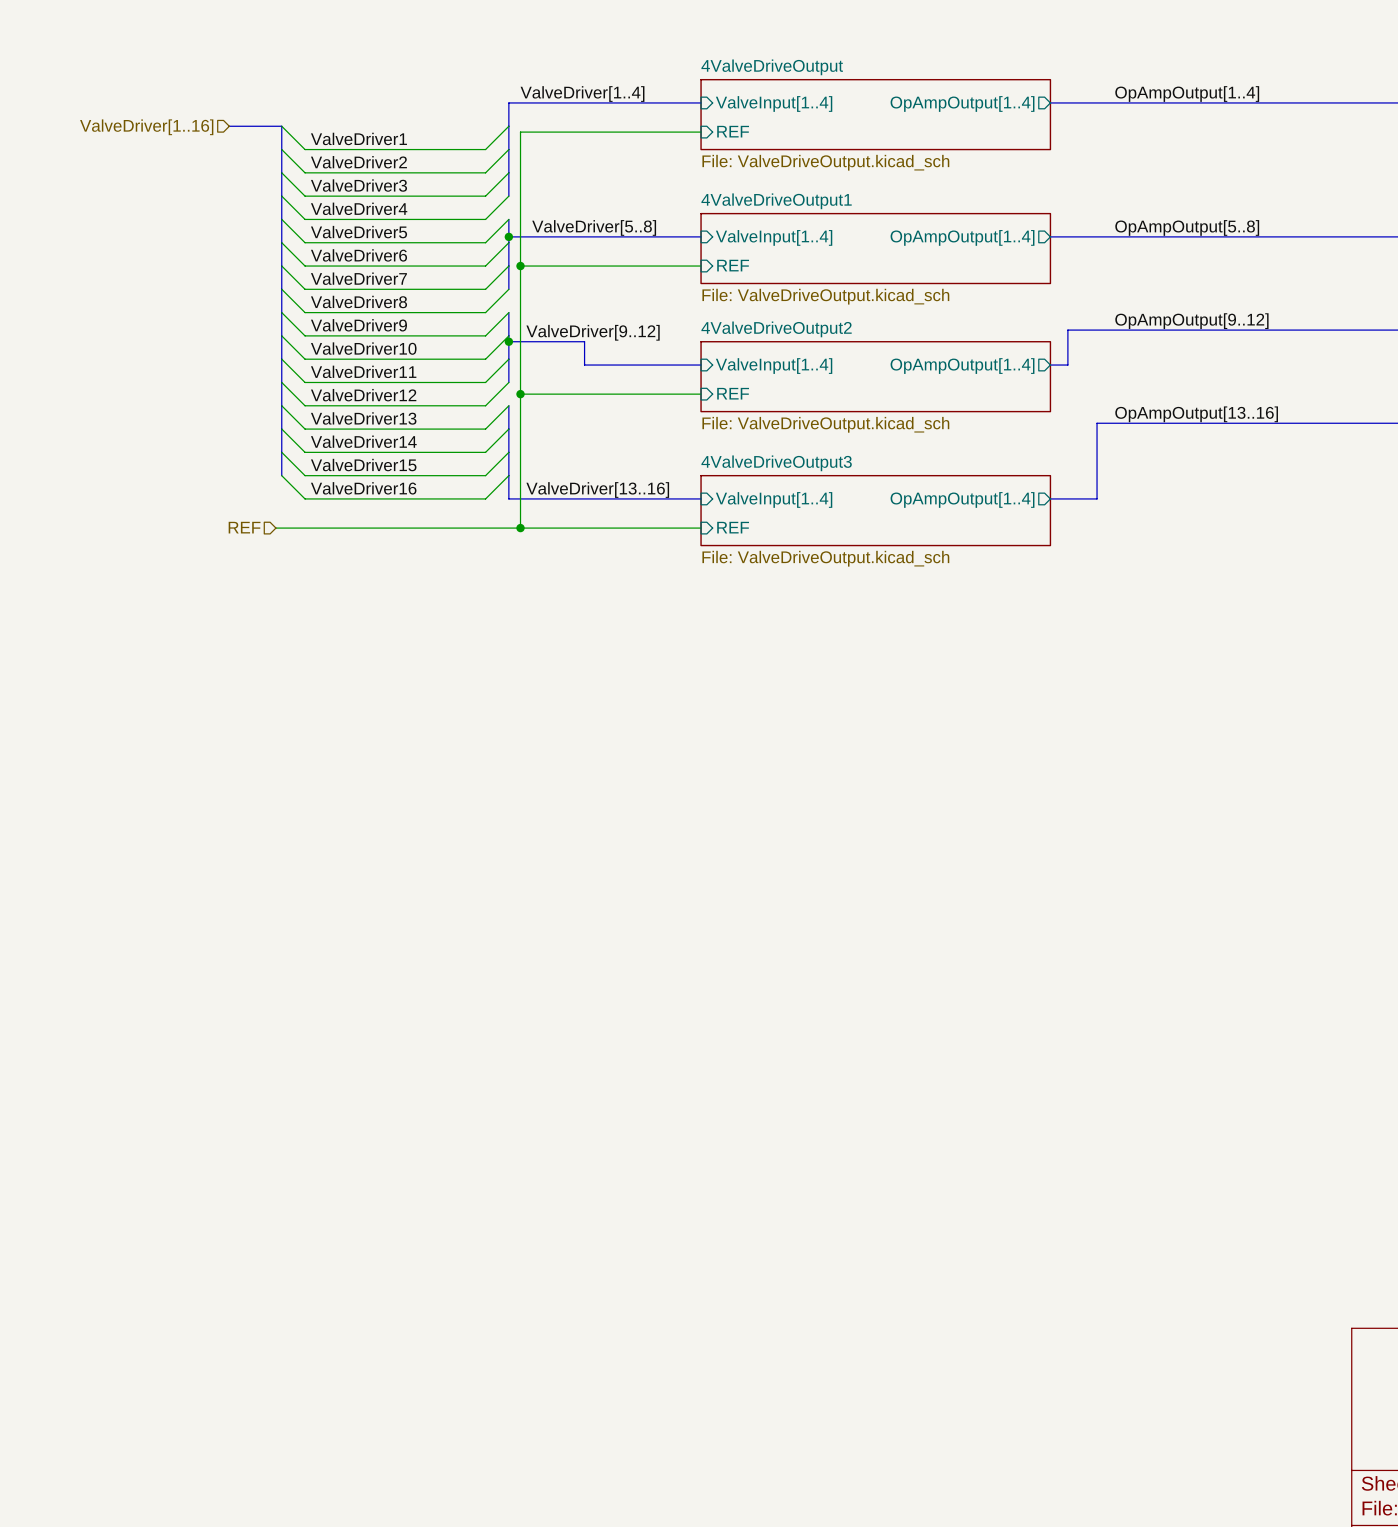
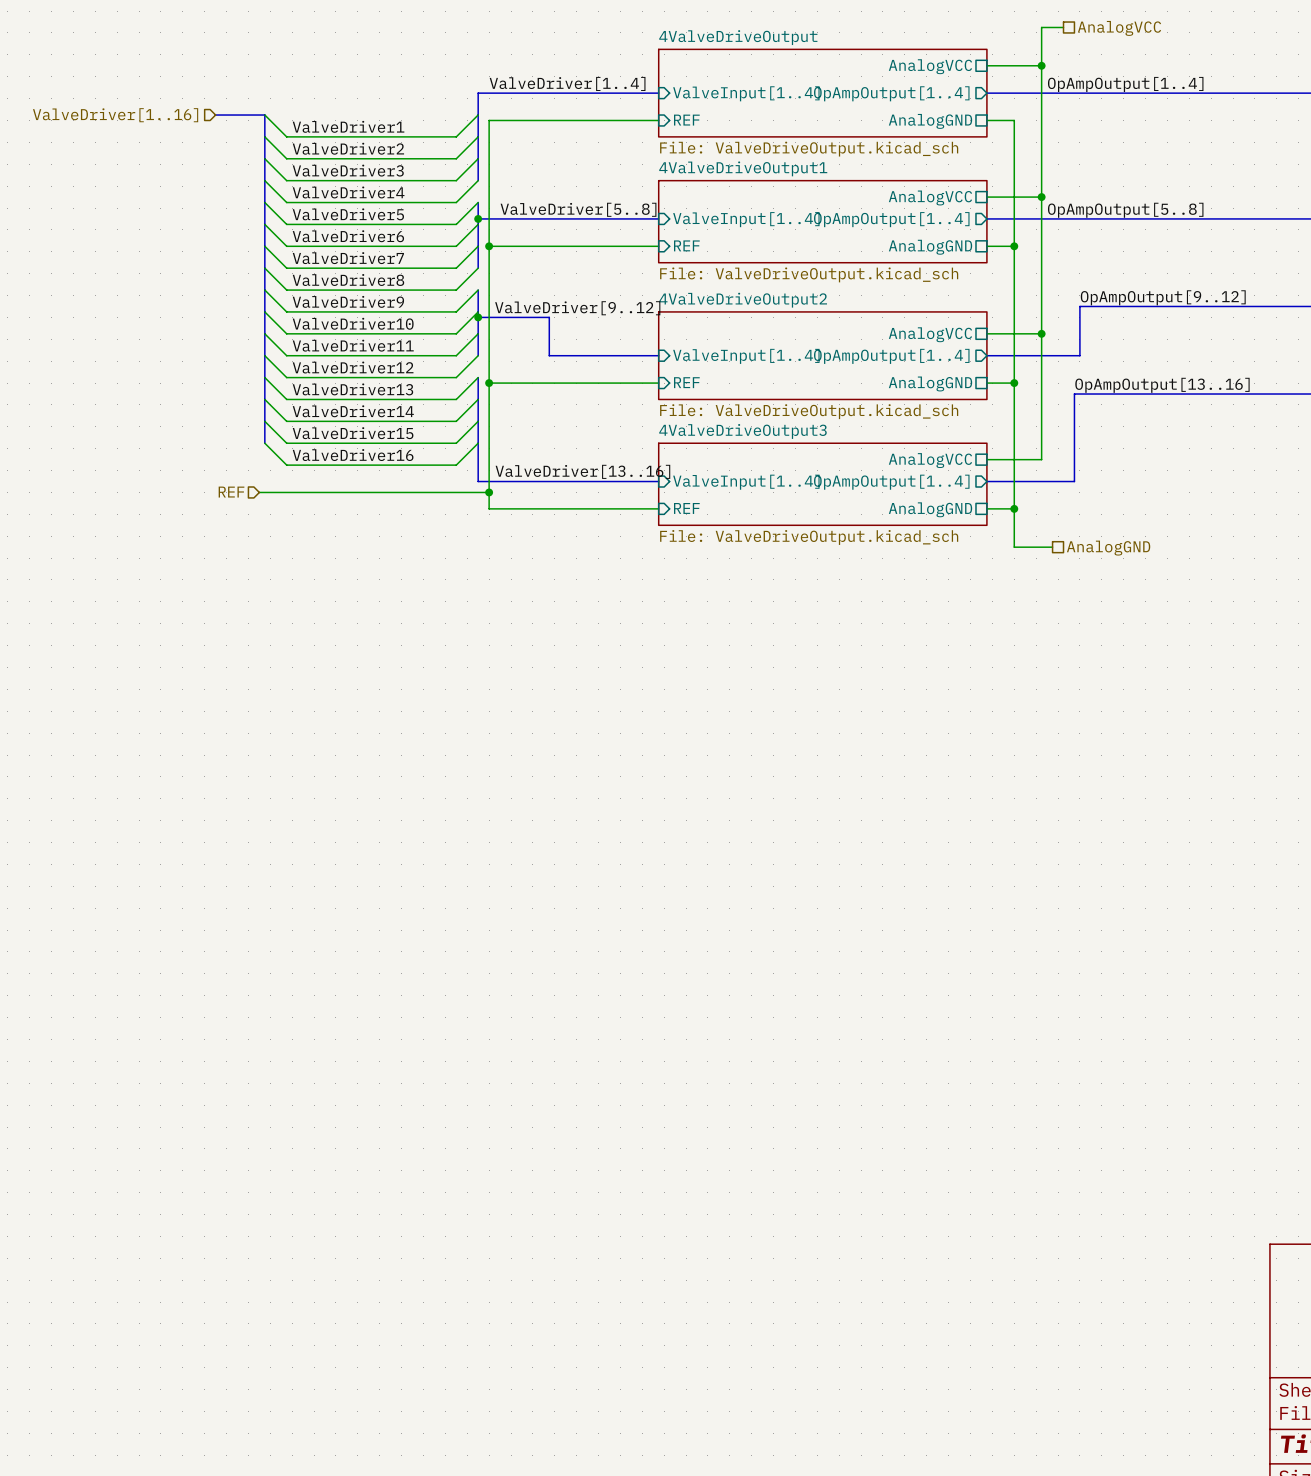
wire: none -> (1063, 27) (1041, 27) (1041, 459) (986, 459)
hierarchical label: none -> AnalogVCC (1119, 28)
wire: none -> (986, 65) (1041, 65)
junction: none -> (1041, 65)
sheet pin: none -> AnalogVCC (930, 66)
sheet 4ValveDriveOutput shape: [700, 78, 1052, 151] -> [658, 48, 988, 138]
wire: none -> (986, 120) (1014, 120) (1014, 547) (1052, 547)
sheet pin: none -> AnalogGND (930, 121)
sheet 4ValveDriveOutput1 shape: [700, 212, 1052, 285] -> [658, 180, 988, 264]
wire: none -> (986, 197) (1041, 197)
junction: none -> (1041, 197)
sheet pin: none -> AnalogVCC (930, 197)
wire: none -> (986, 246) (1014, 246)
junction: none -> (1014, 246)
sheet pin: none -> AnalogGND (930, 247)
label position: OpAmpOutput[9..12] (1191, 321) -> OpAmpOutput[9..12] (1163, 297)
bus: (1149, 330) (1067, 330) (1067, 365) (1050, 365) -> (1079, 306) (1079, 355) (986, 355)
sheet 4ValveDriveOutput2 shape: [700, 341, 1052, 413] -> [658, 311, 988, 401]
wire: none -> (986, 333) (1041, 333)
junction: none -> (1041, 333)
sheet pin: none -> AnalogVCC (930, 334)
bus: (584, 365) (701, 365) -> (549, 339) (549, 355) (658, 355)
sheet pin position: ValveInput[1..4] (774, 366) -> ValveInput[1..4] (746, 356)
sheet pin position: OpAmpOutput[1..4] (962, 366) -> OpAmpOutput[1..4] (891, 356)
sheet pin position: REF (733, 393) -> REF (686, 382)
wire: (520, 394) (701, 394) -> (489, 383) (658, 383)
junction position: (520, 394) -> (489, 383)
wire: none -> (986, 383) (1014, 383)
junction: none -> (1014, 383)
sheet pin: none -> AnalogGND (930, 383)
label position: OpAmpOutput[13..16] (1196, 414) -> OpAmpOutput[13..16] (1162, 385)
bus: (1143, 423) (1097, 423) (1097, 498) (1050, 498) -> (1074, 394) (1074, 481) (986, 481)
sheet 4ValveDriveOutput3 shape: [700, 474, 1052, 547] -> [658, 442, 988, 526]
label position: ValveDriver[13..16] (597, 490) -> ValveDriver[13..16] (582, 471)
sheet pin: none -> AnalogVCC (930, 460)
bus: (508, 498) (701, 498) -> (478, 465) (478, 481) (658, 481)
sheet pin position: ValveInput[1..4] (774, 499) -> ValveInput[1..4] (746, 482)
sheet pin position: OpAmpOutput[1..4] (962, 499) -> OpAmpOutput[1..4] (891, 482)
sheet pin position: REF (733, 527) -> REF (686, 508)
wire: (520, 528) (701, 528) -> (489, 492) (489, 508) (658, 508)
wire: none -> (986, 508) (1014, 508)
junction: none -> (1014, 508)
sheet pin: none -> AnalogGND (930, 509)
hierarchical label: none -> AnalogGND (1108, 548)

